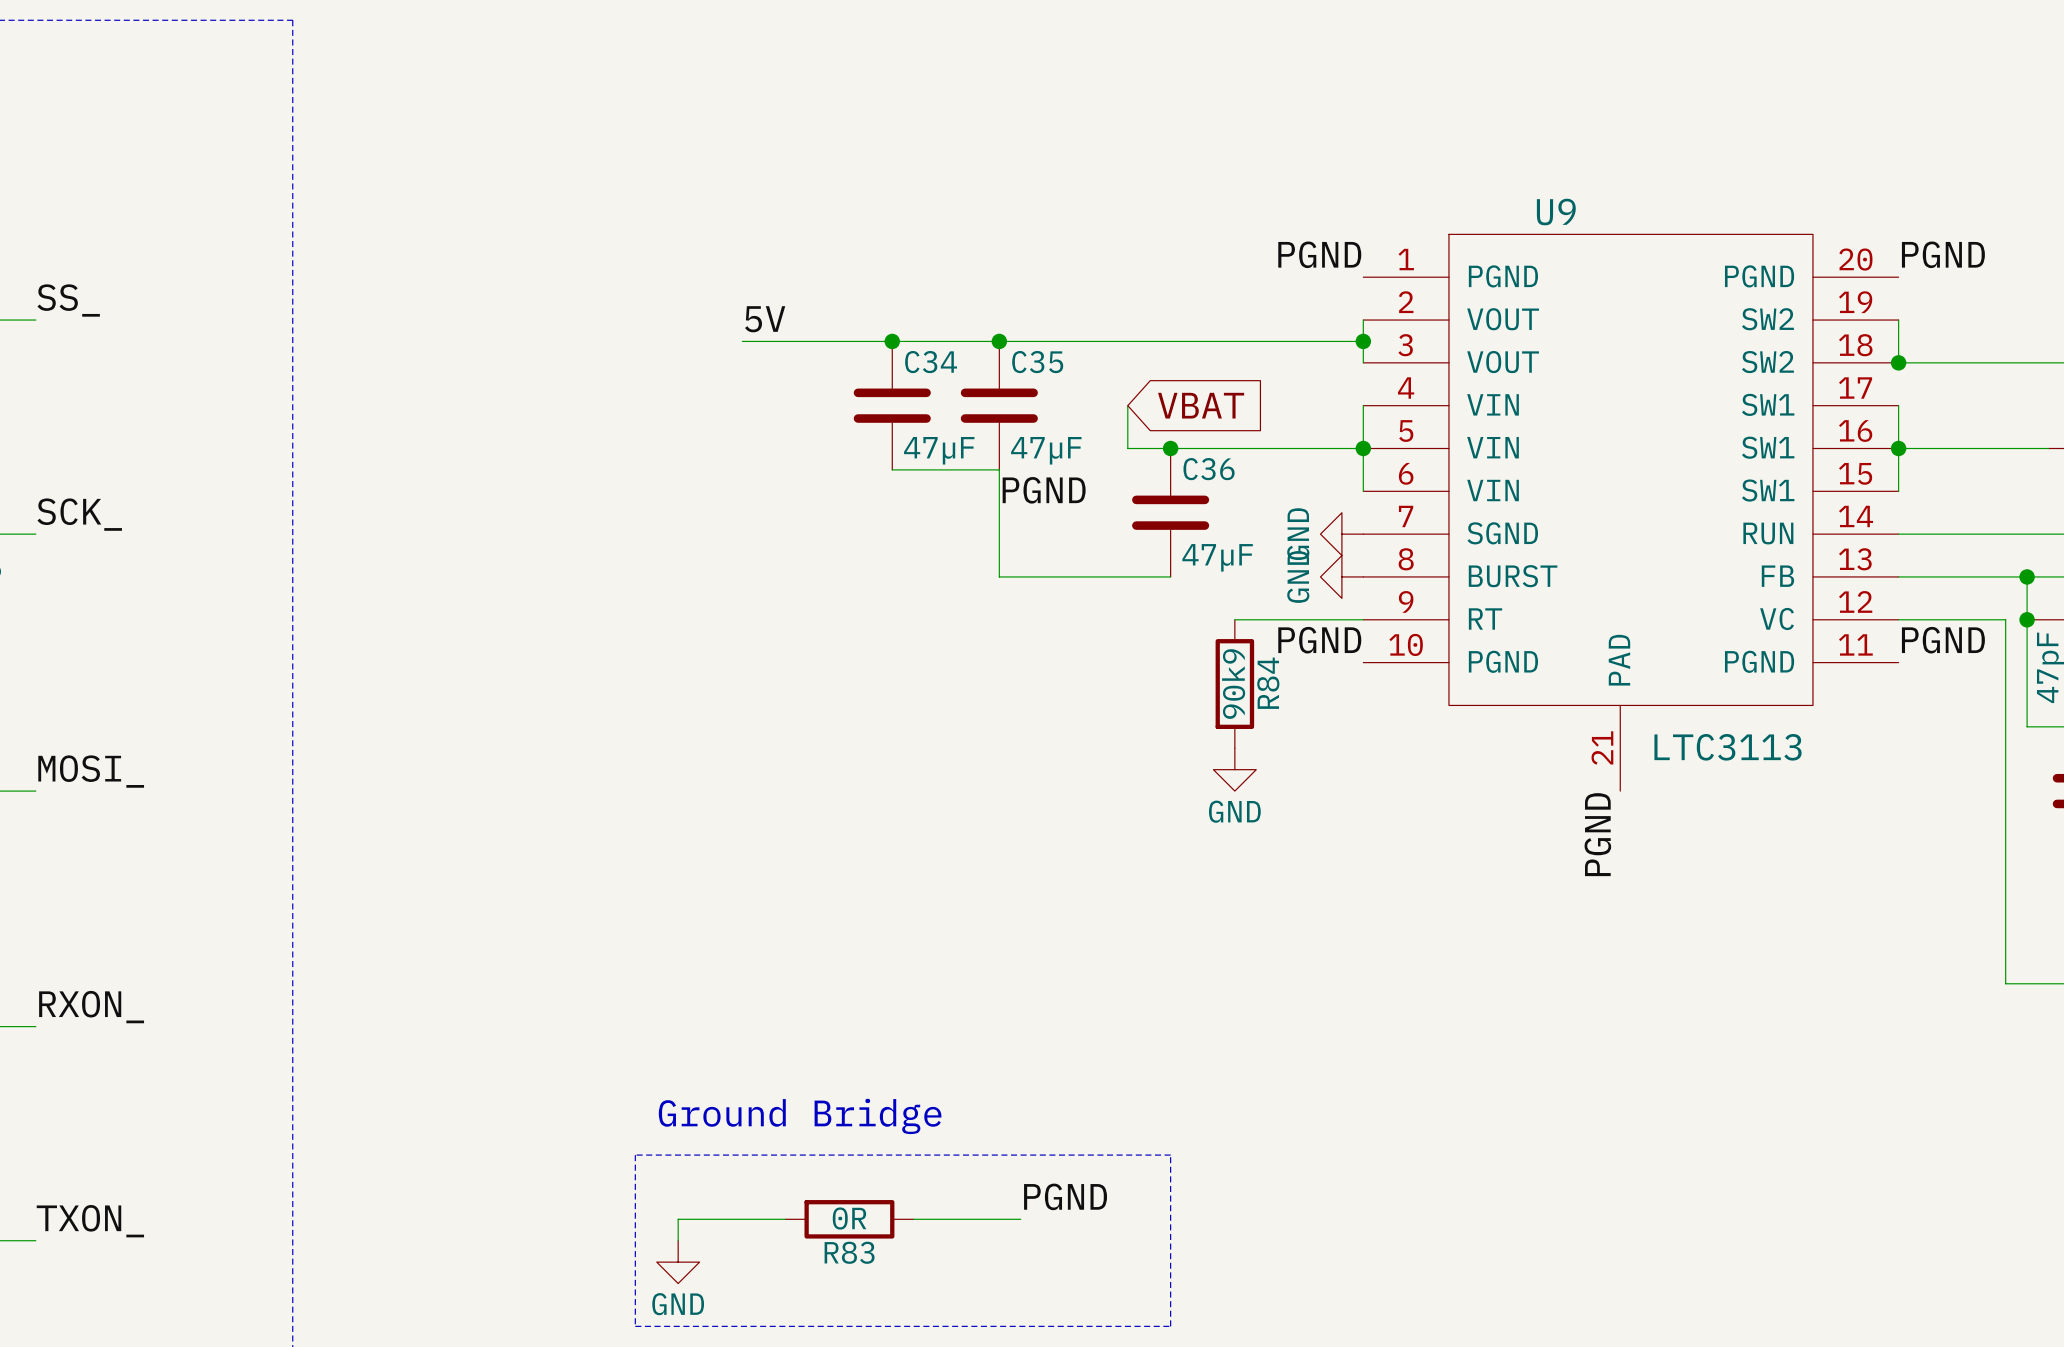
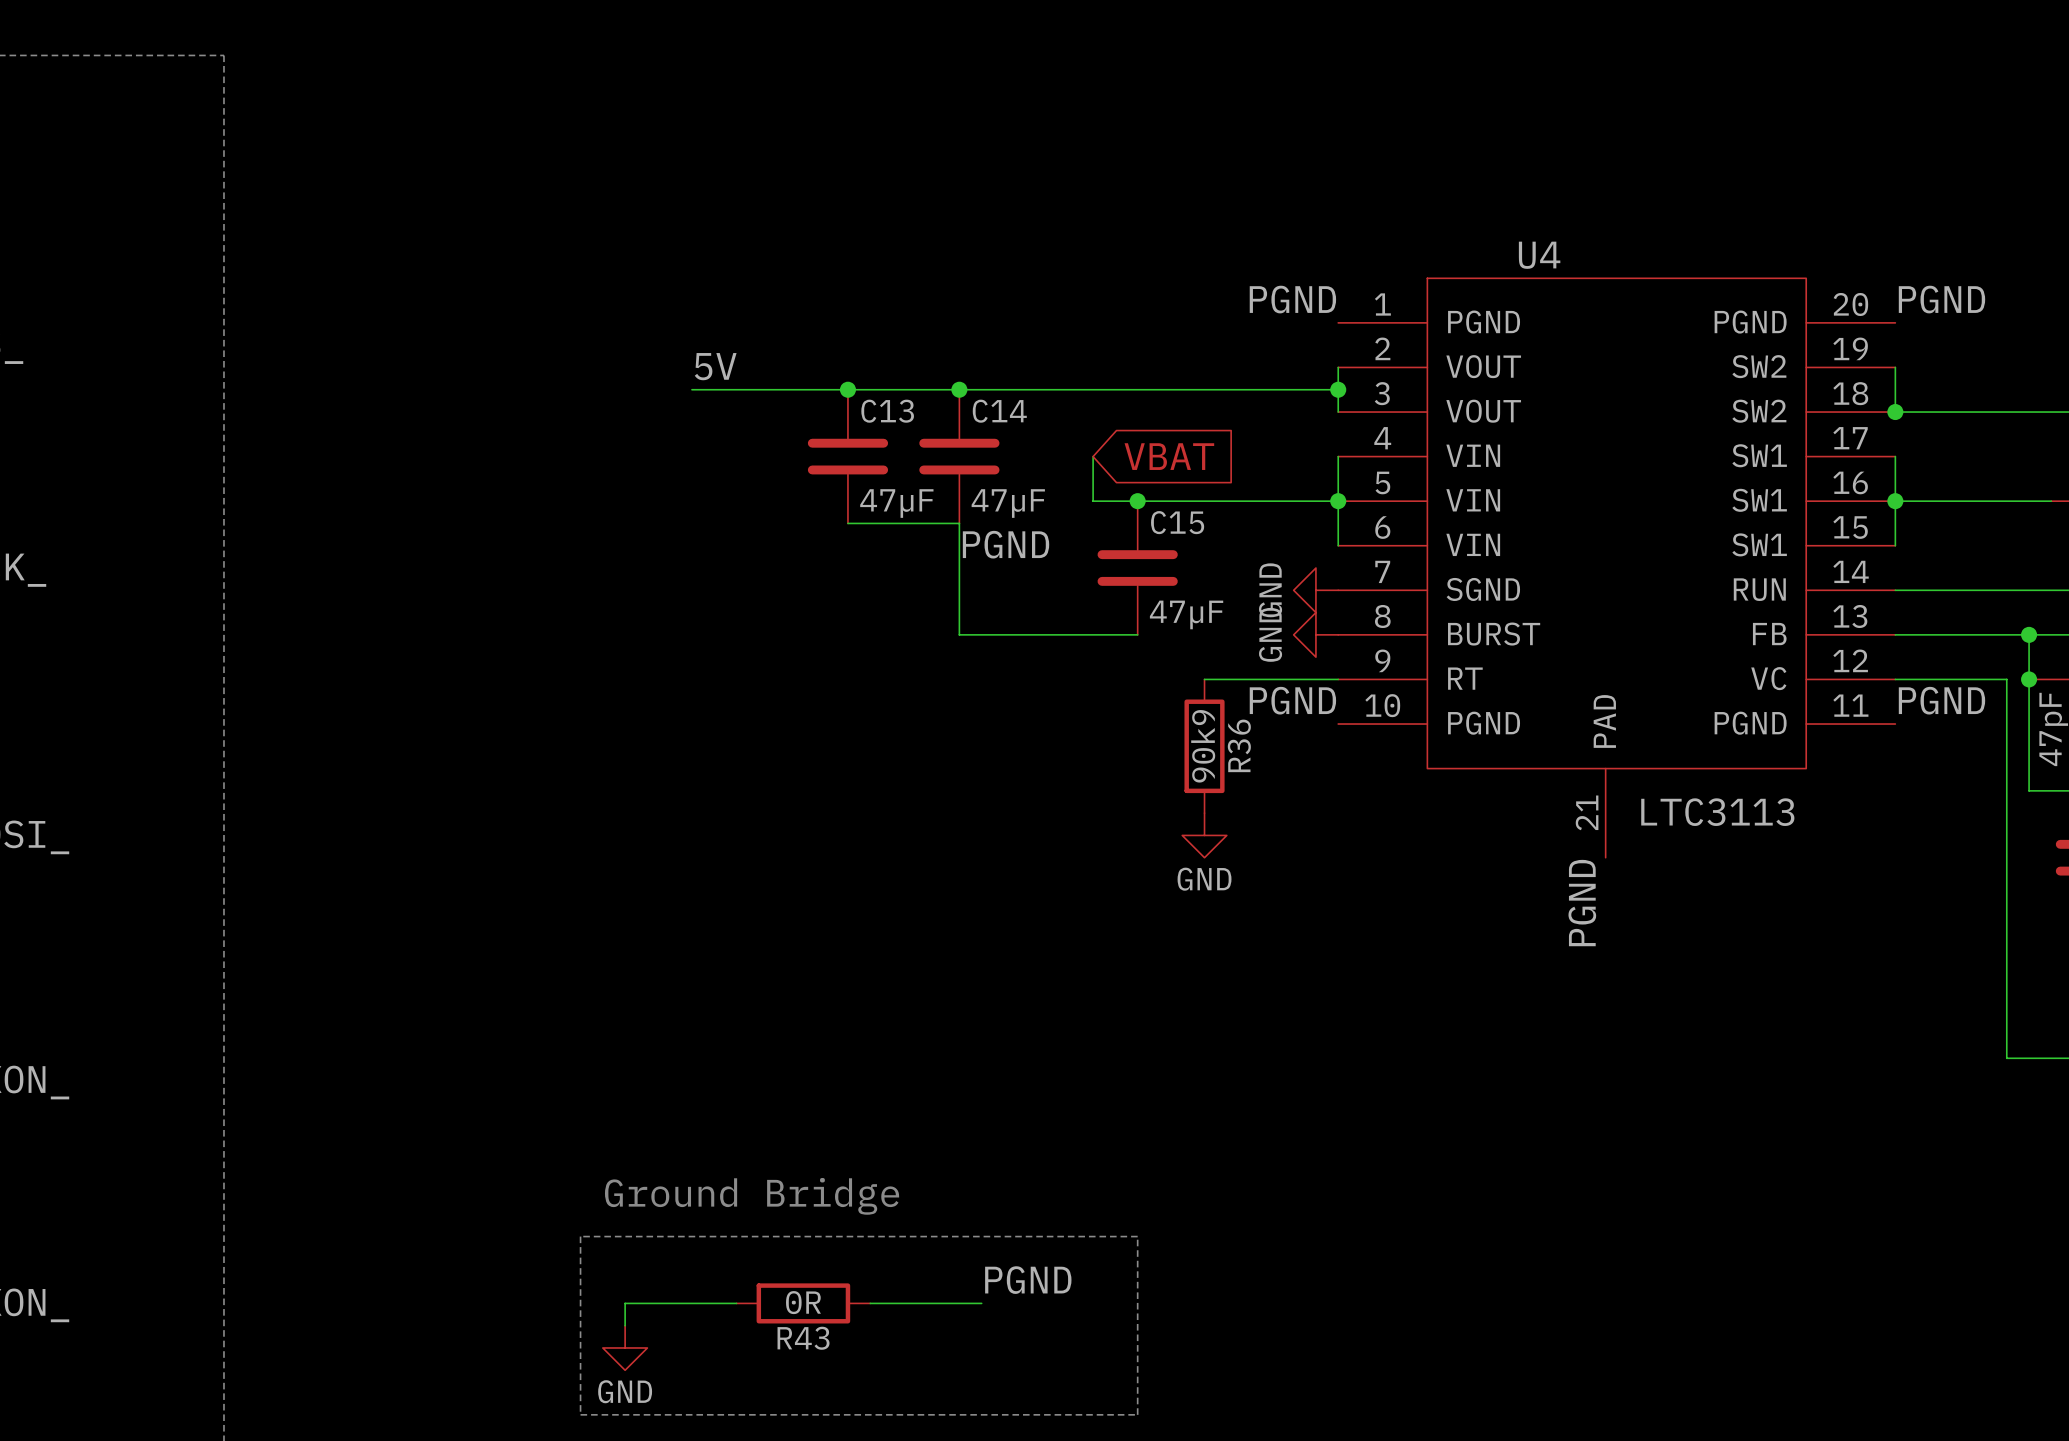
U9 name: U9 (1556, 212) -> U4 (1539, 255)
C34 name: C34 (931, 362) -> C13 (887, 411)
C35 name: C35 (1037, 362) -> C14 (999, 411)
C36 name: C36 (1209, 469) -> C15 (1177, 522)
R84 name: R84 (1268, 683) -> R36 (1239, 745)
R83 name: R83 (849, 1252) -> R43 (803, 1338)

